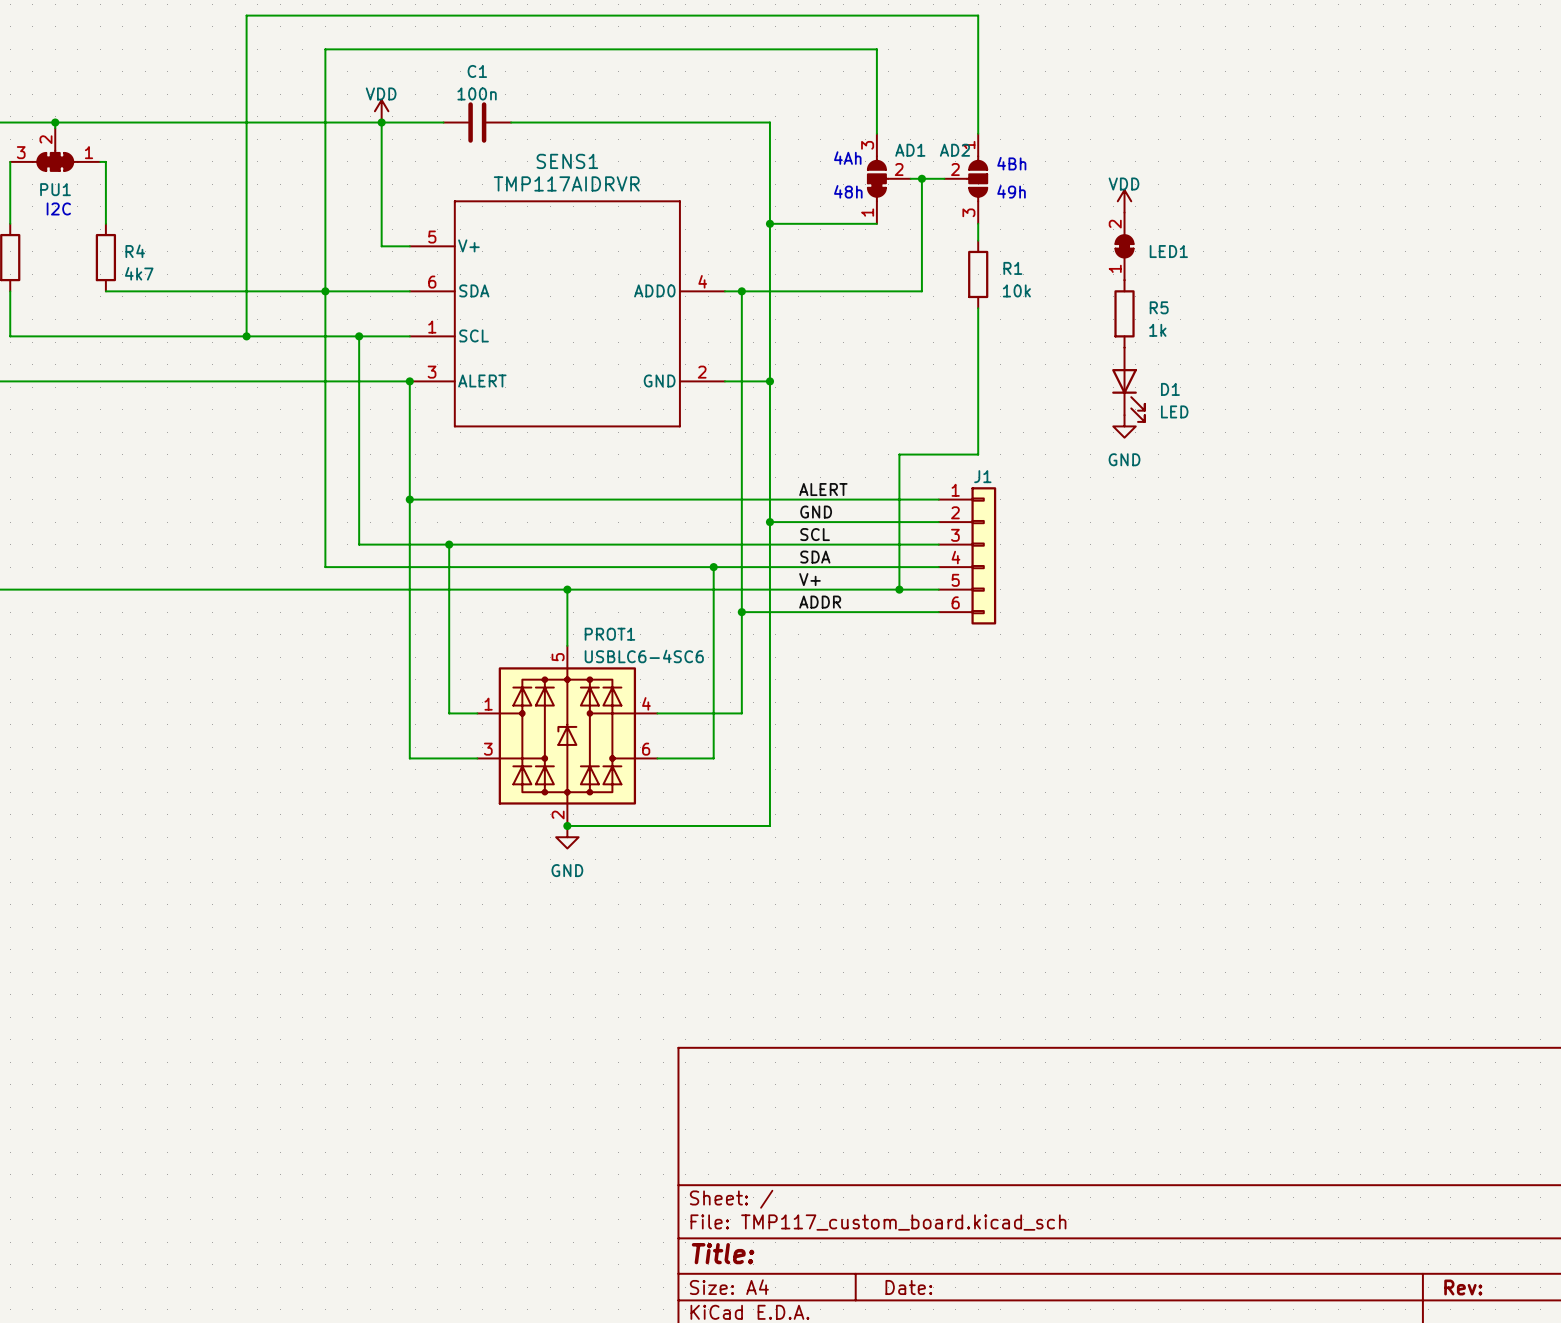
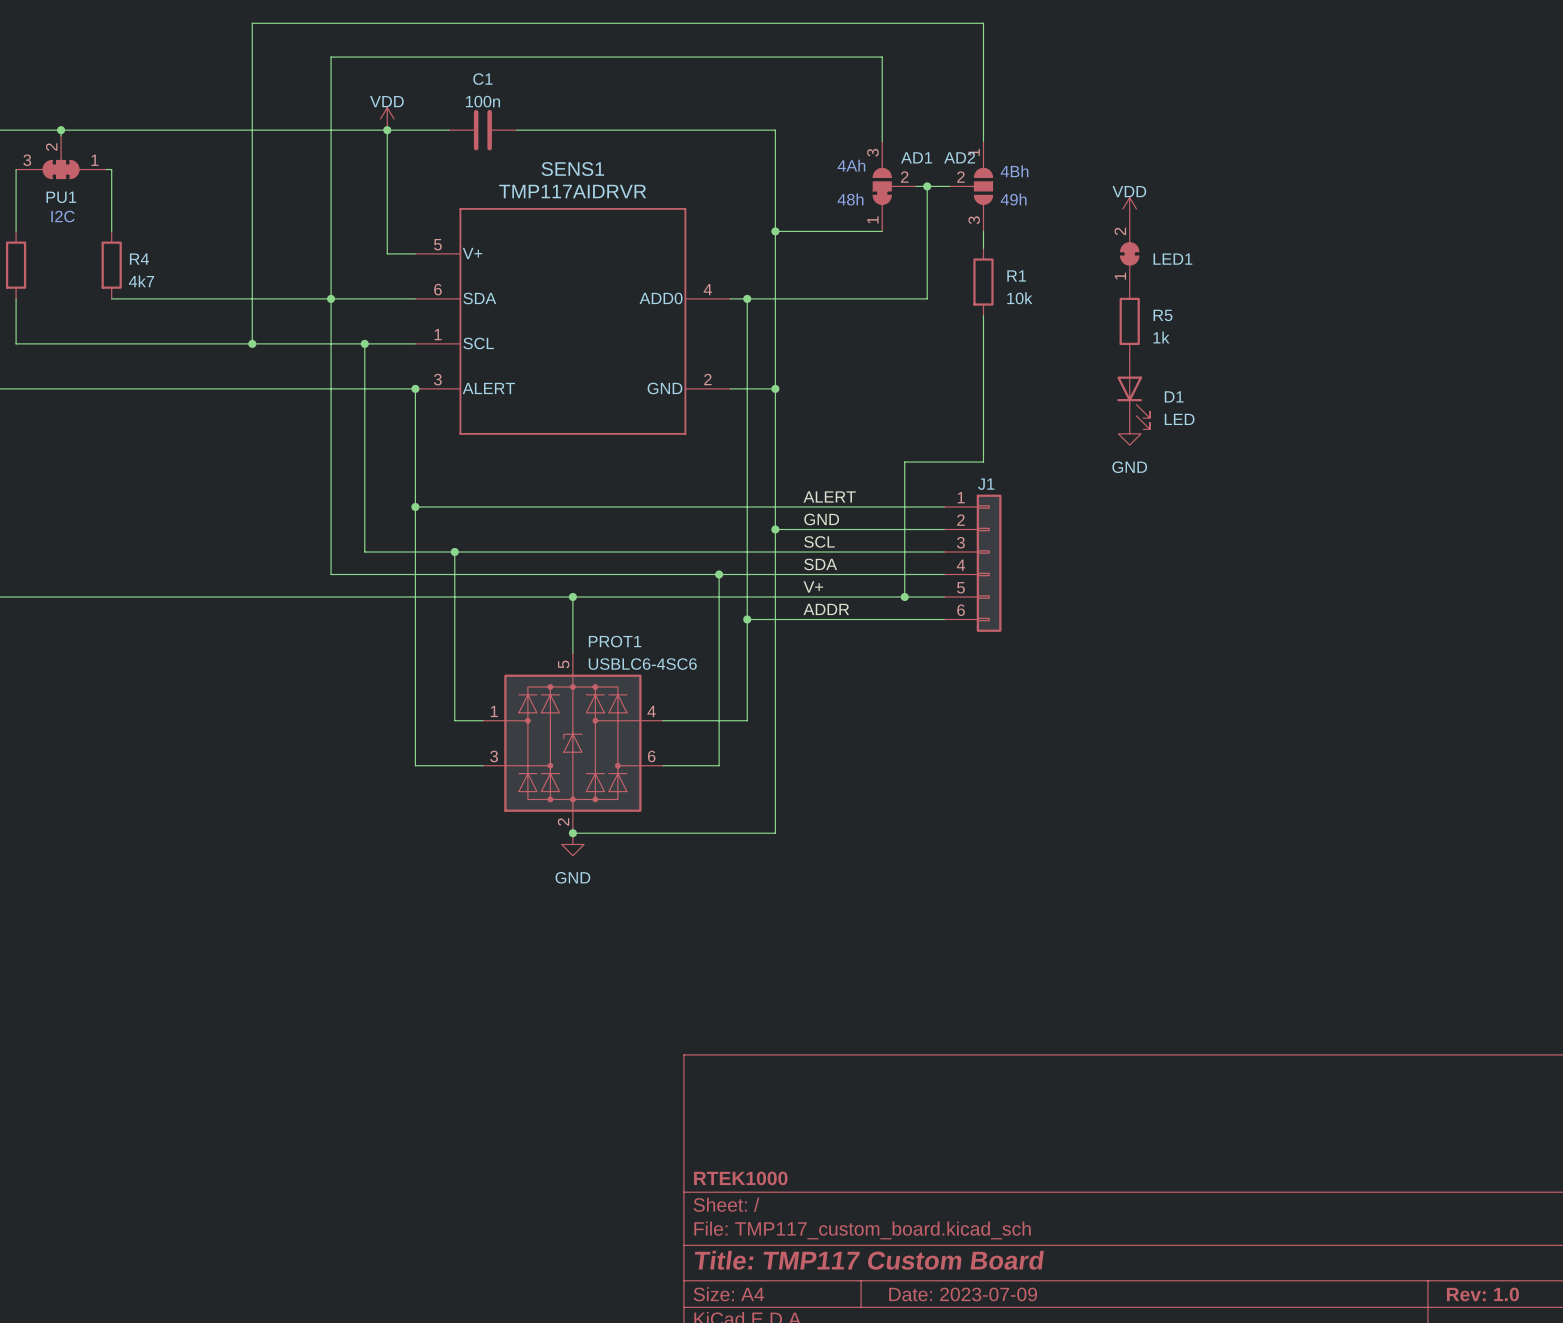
title block: none -> RTEK1000 (740, 1178)
title block: Title: (723, 1253) -> Title: TMP117 Custom Board (869, 1260)
title block: Date: (908, 1287) -> Date: 2023-07-09 (963, 1294)
title block: Rev: (1463, 1287) -> Rev: 1.0 (1482, 1294)

